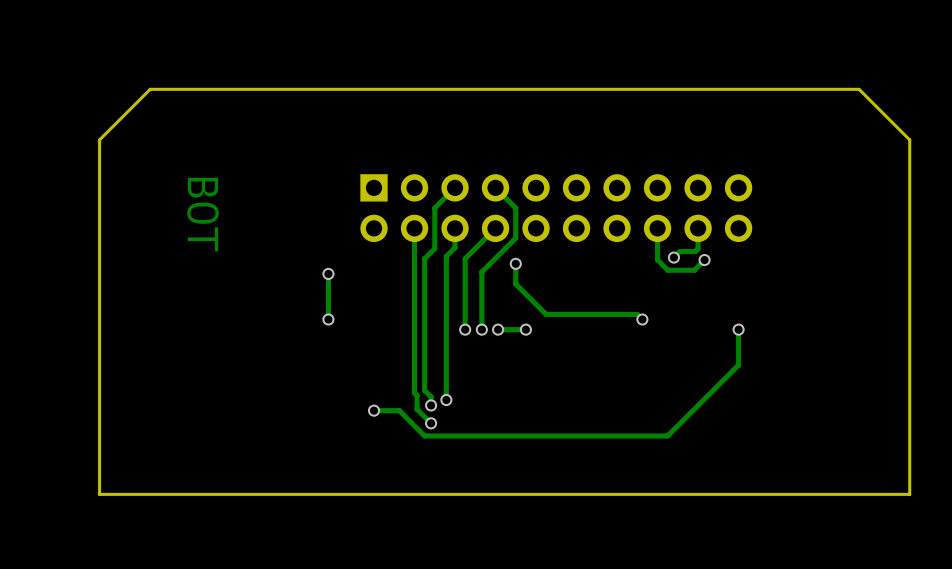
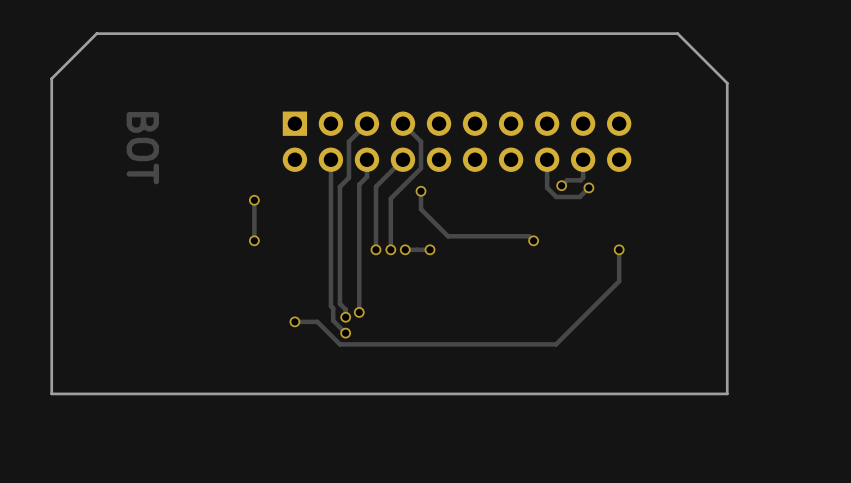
board edge: (859, 89) (150, 89) (99, 139) (99, 494) (909, 494) (909, 139) (859, 89) -> (677, 33) (727, 83) (727, 393) (51, 393) (51, 78) (96, 33) (677, 33)

